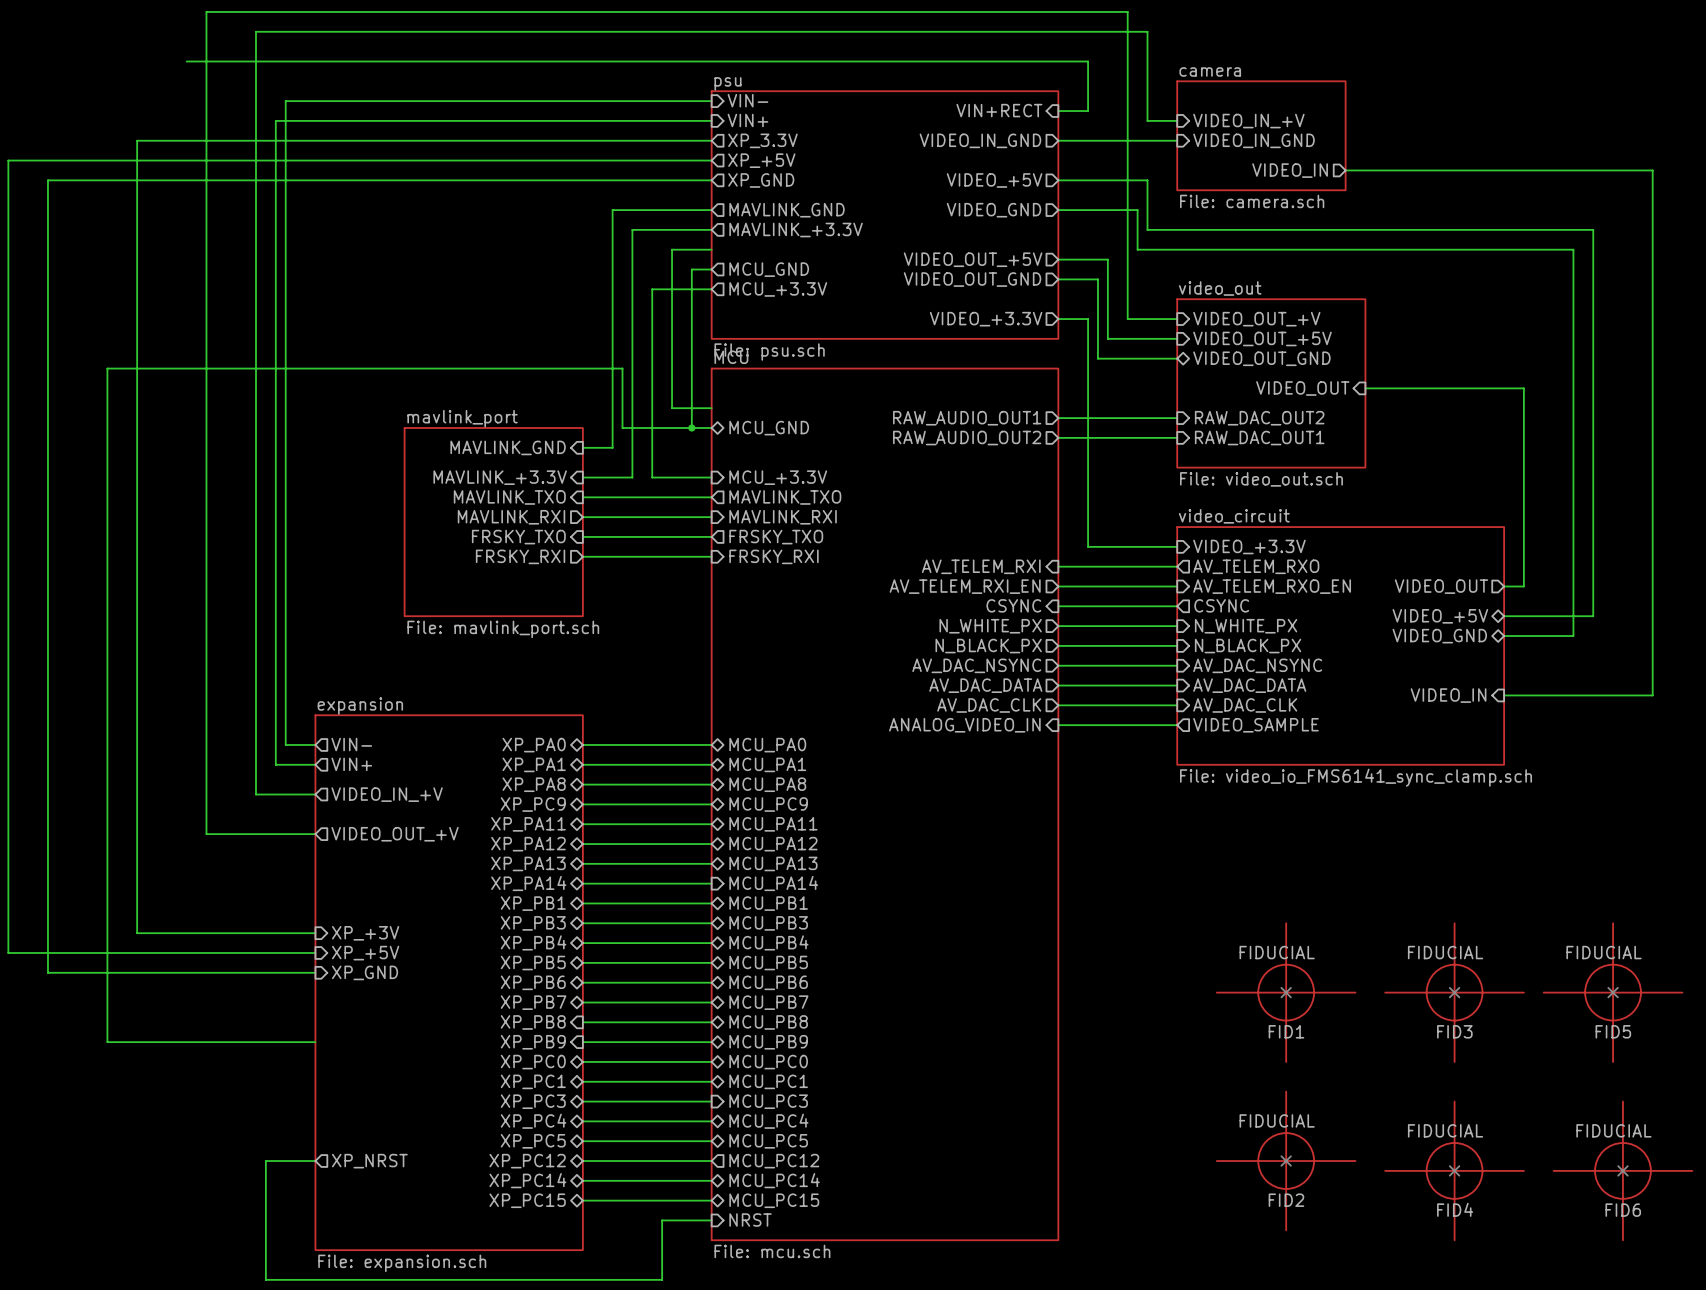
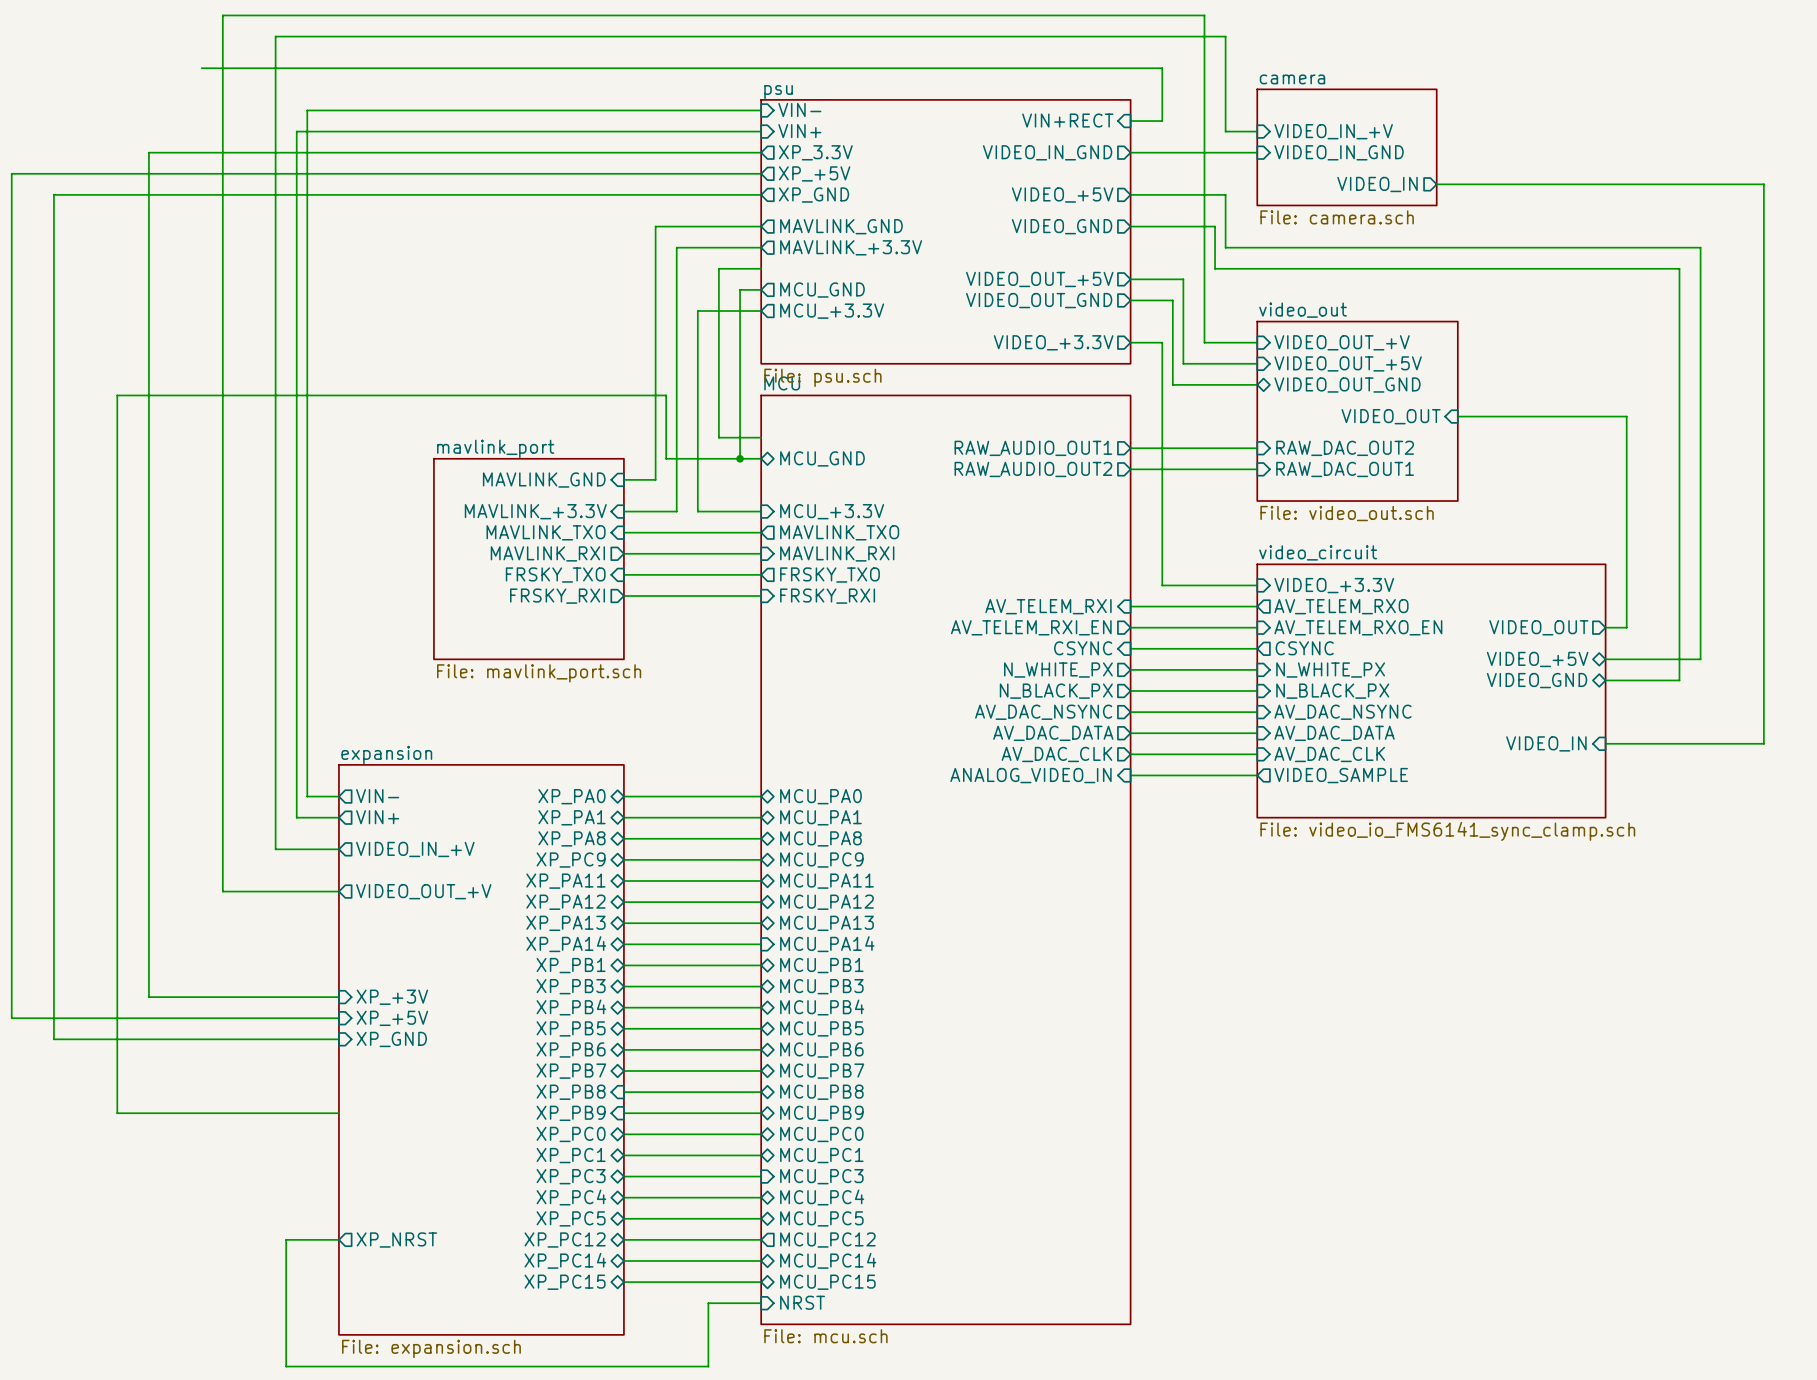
no-connect mark: (1286, 992) -> none
FID1: FIDUCIAL (1286, 992) -> none
no-connect mark: (1454, 992) -> none
FID3: FIDUCIAL (1454, 992) -> none
no-connect mark: (1613, 992) -> none
FID5: FIDUCIAL (1613, 992) -> none
no-connect mark: (1286, 1161) -> none
FID2: FIDUCIAL (1286, 1161) -> none
no-connect mark: (1454, 1170) -> none
FID4: FIDUCIAL (1454, 1170) -> none
no-connect mark: (1622, 1170) -> none
FID6: FIDUCIAL (1622, 1170) -> none

